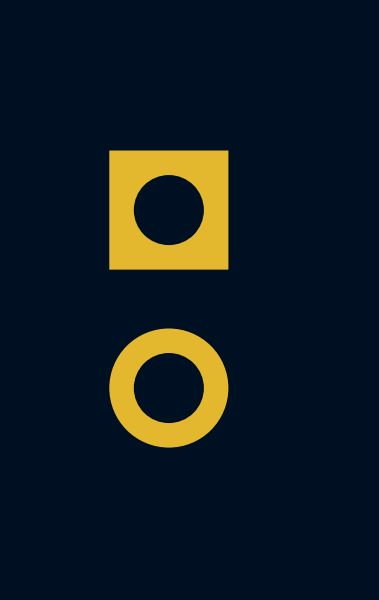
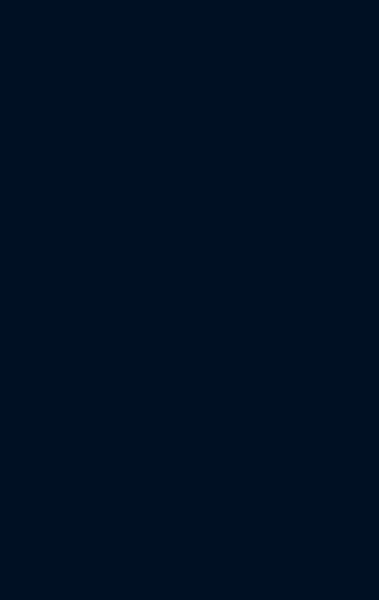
part: (168, 299) -> none

